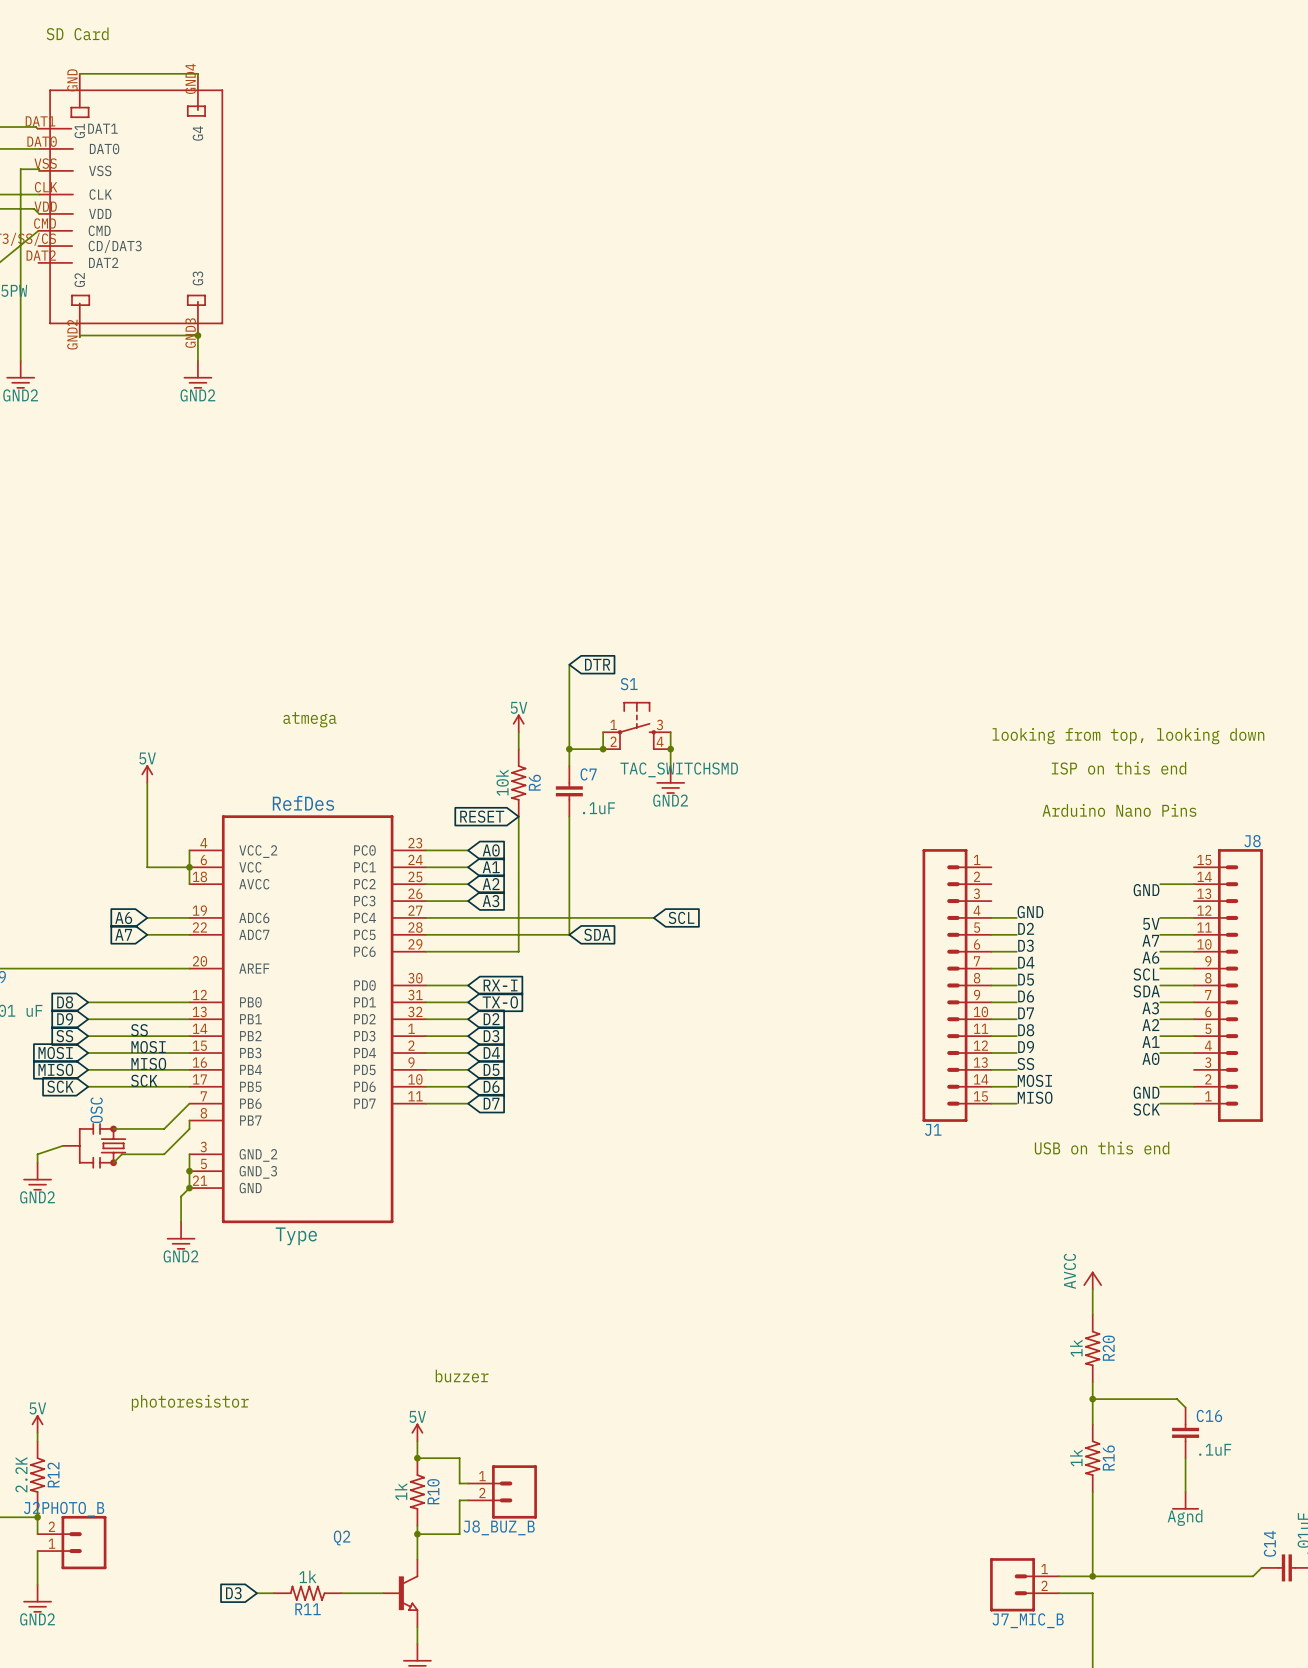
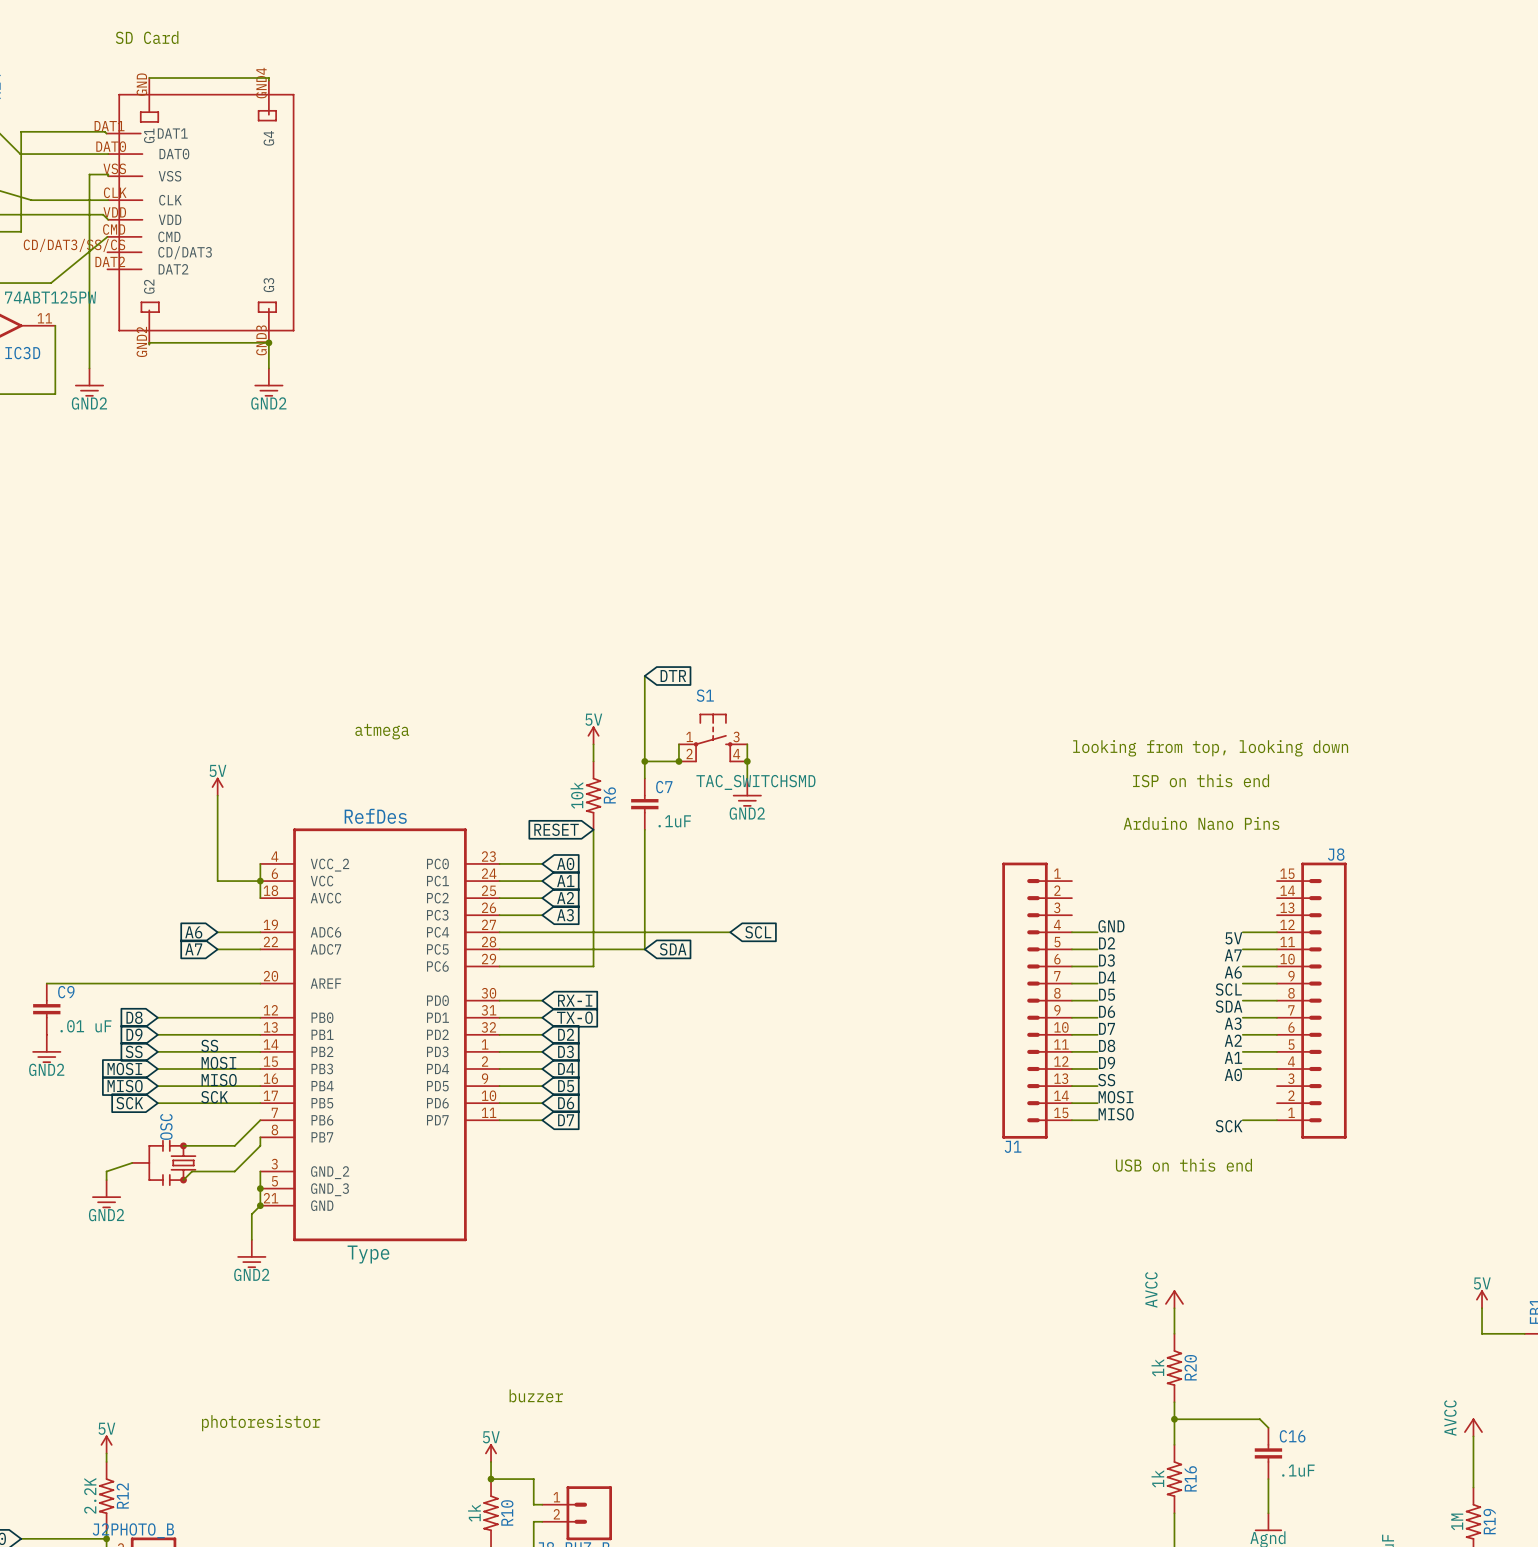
wire: (1160, 884) (1194, 884) -> none
label: GND (1146, 890) -> none
wire: (1160, 1086) (1194, 1086) -> none
label: GND (1146, 1092) -> none

